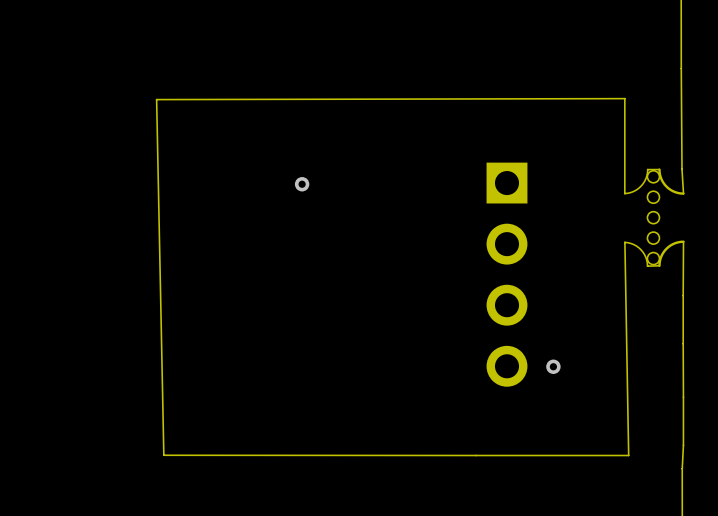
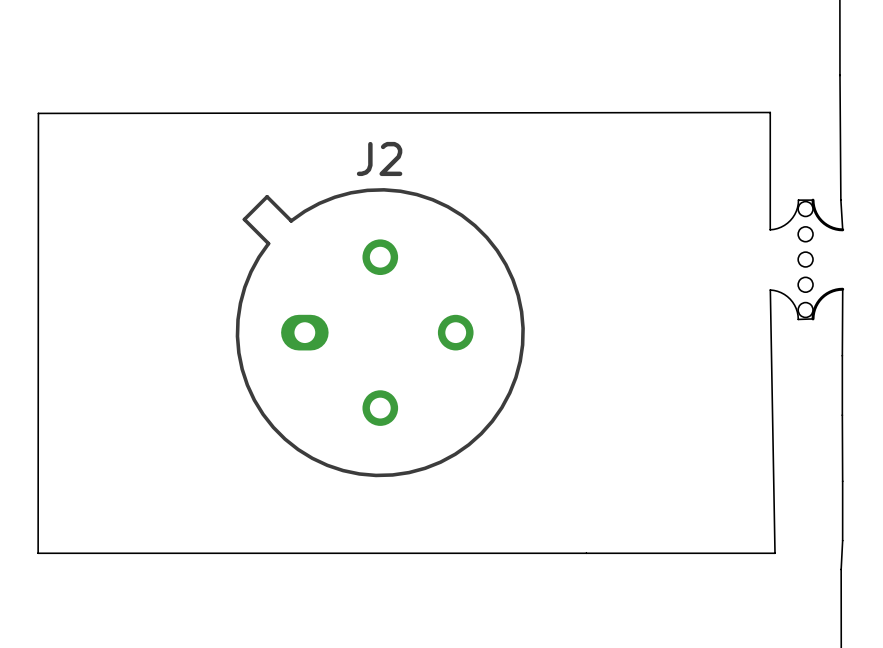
board edge: (624, 98) (156, 99) (163, 455) (475, 455) -> (770, 112) (38, 113) (38, 553) (586, 553)
via: (302, 184) -> none
part: (506, 274) -> none
J2: none -> (380, 332)
via: (553, 366) -> none

